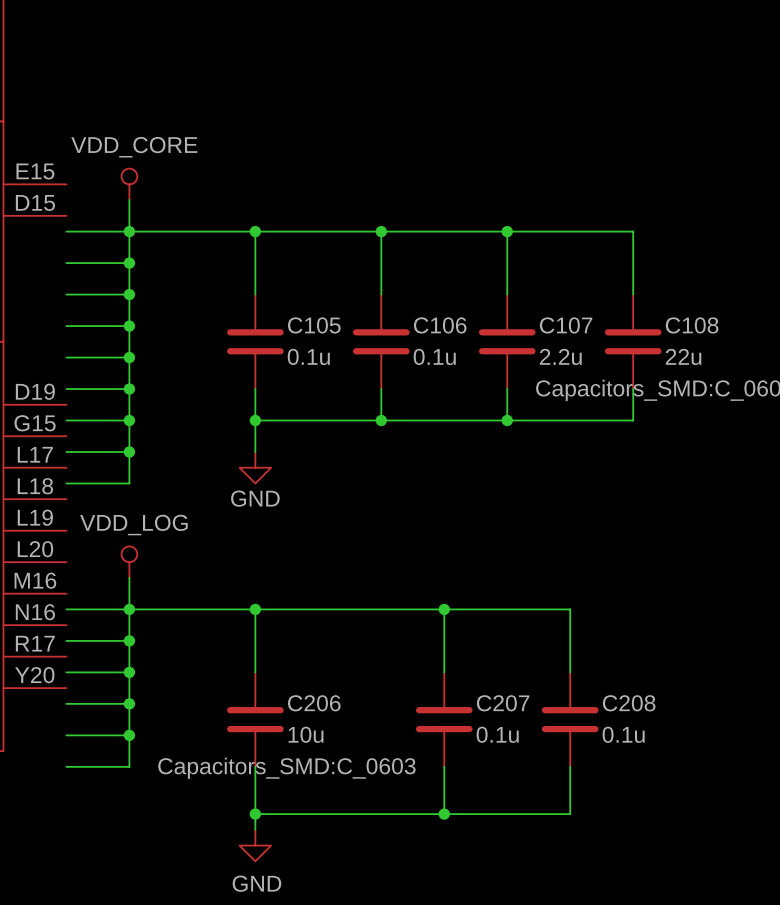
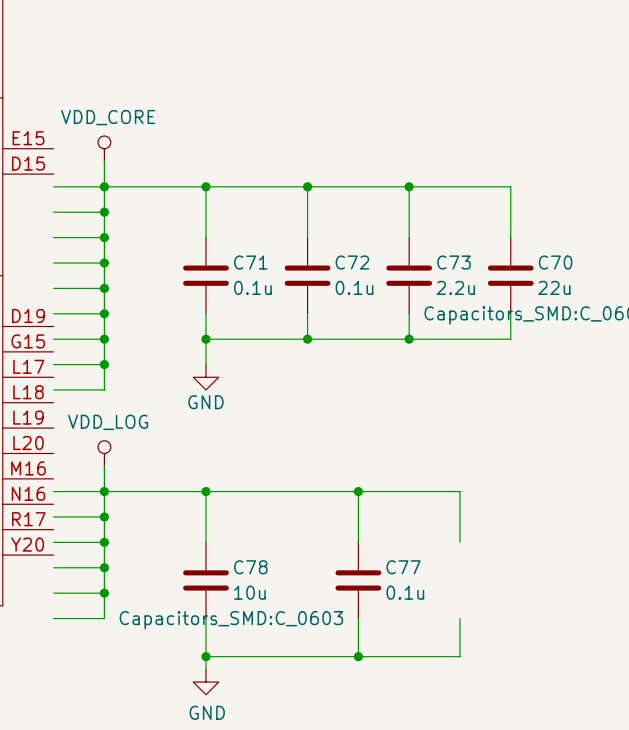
C105 name: C105 (314, 325) -> C71 (250, 262)
C106 name: C106 (440, 325) -> C72 (352, 262)
C107 name: C107 (566, 325) -> C73 (454, 262)
C108 name: C108 (692, 325) -> C70 (555, 262)
C206 name: C206 (314, 703) -> C78 (250, 567)
C207 name: C207 (503, 703) -> C77 (403, 567)
C208: 0.1u (570, 719) -> none

